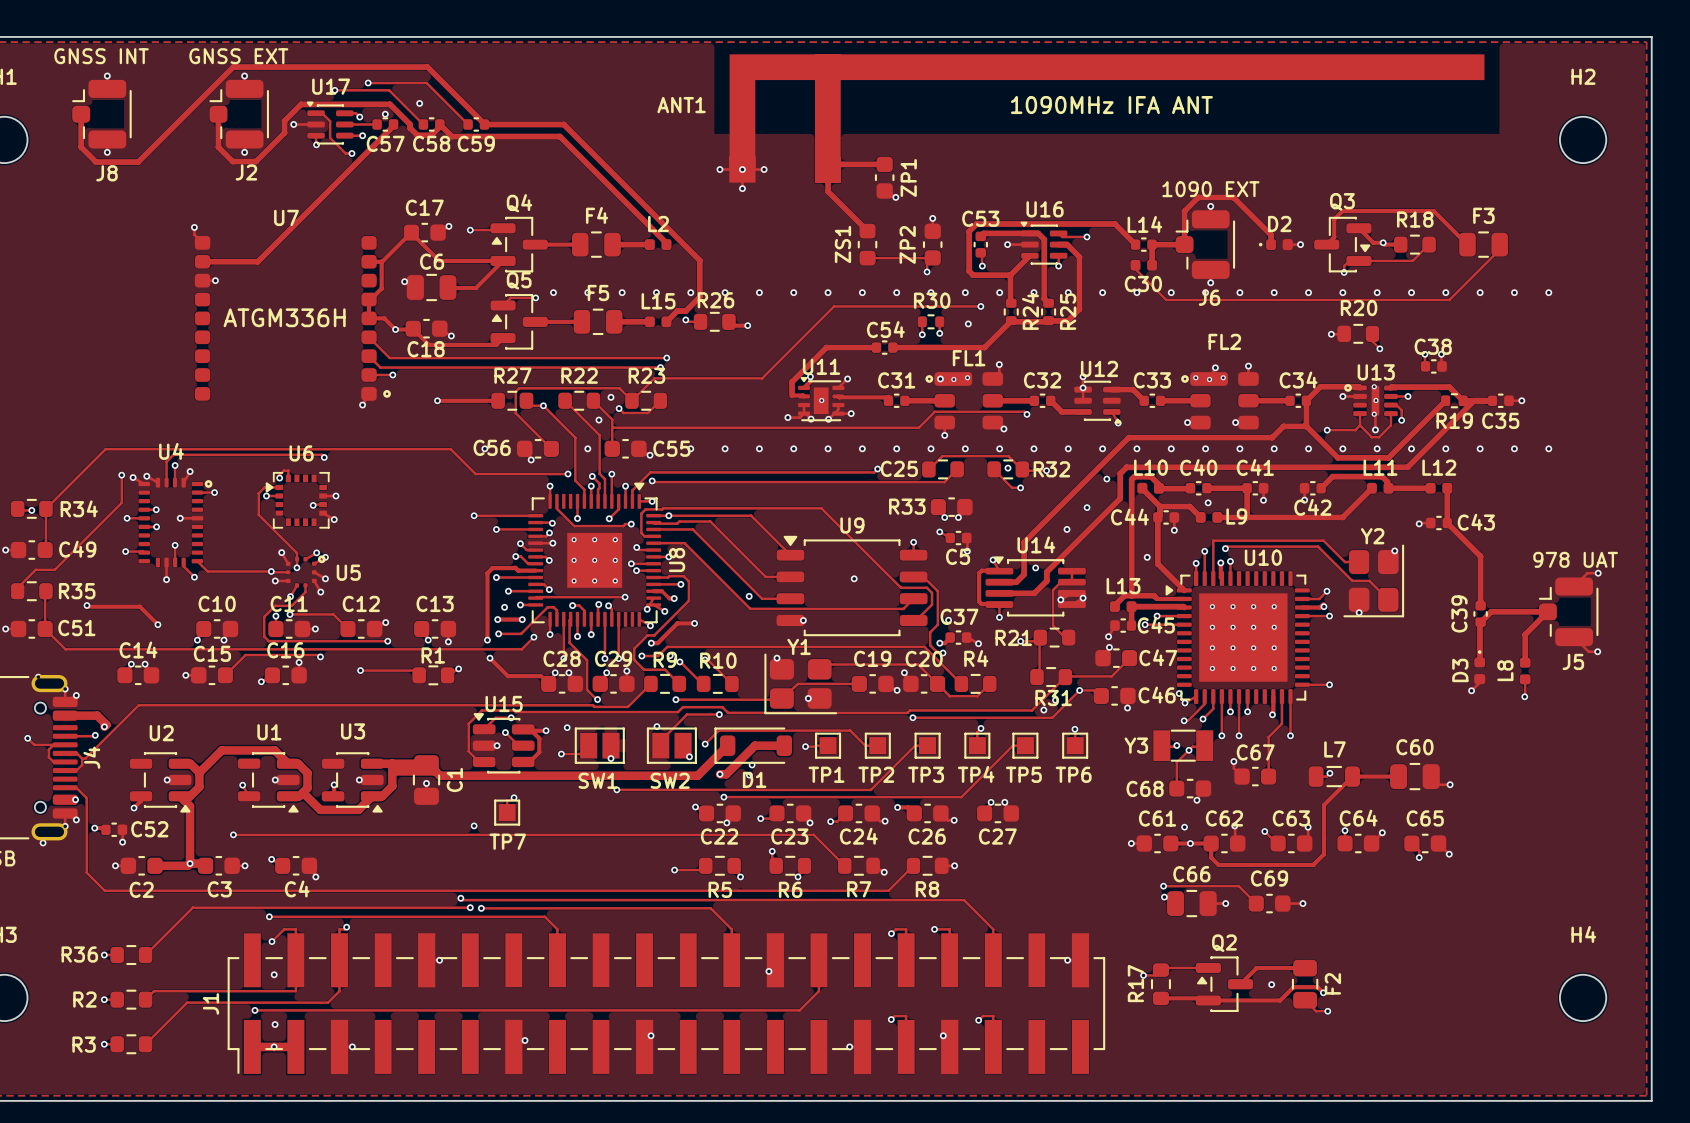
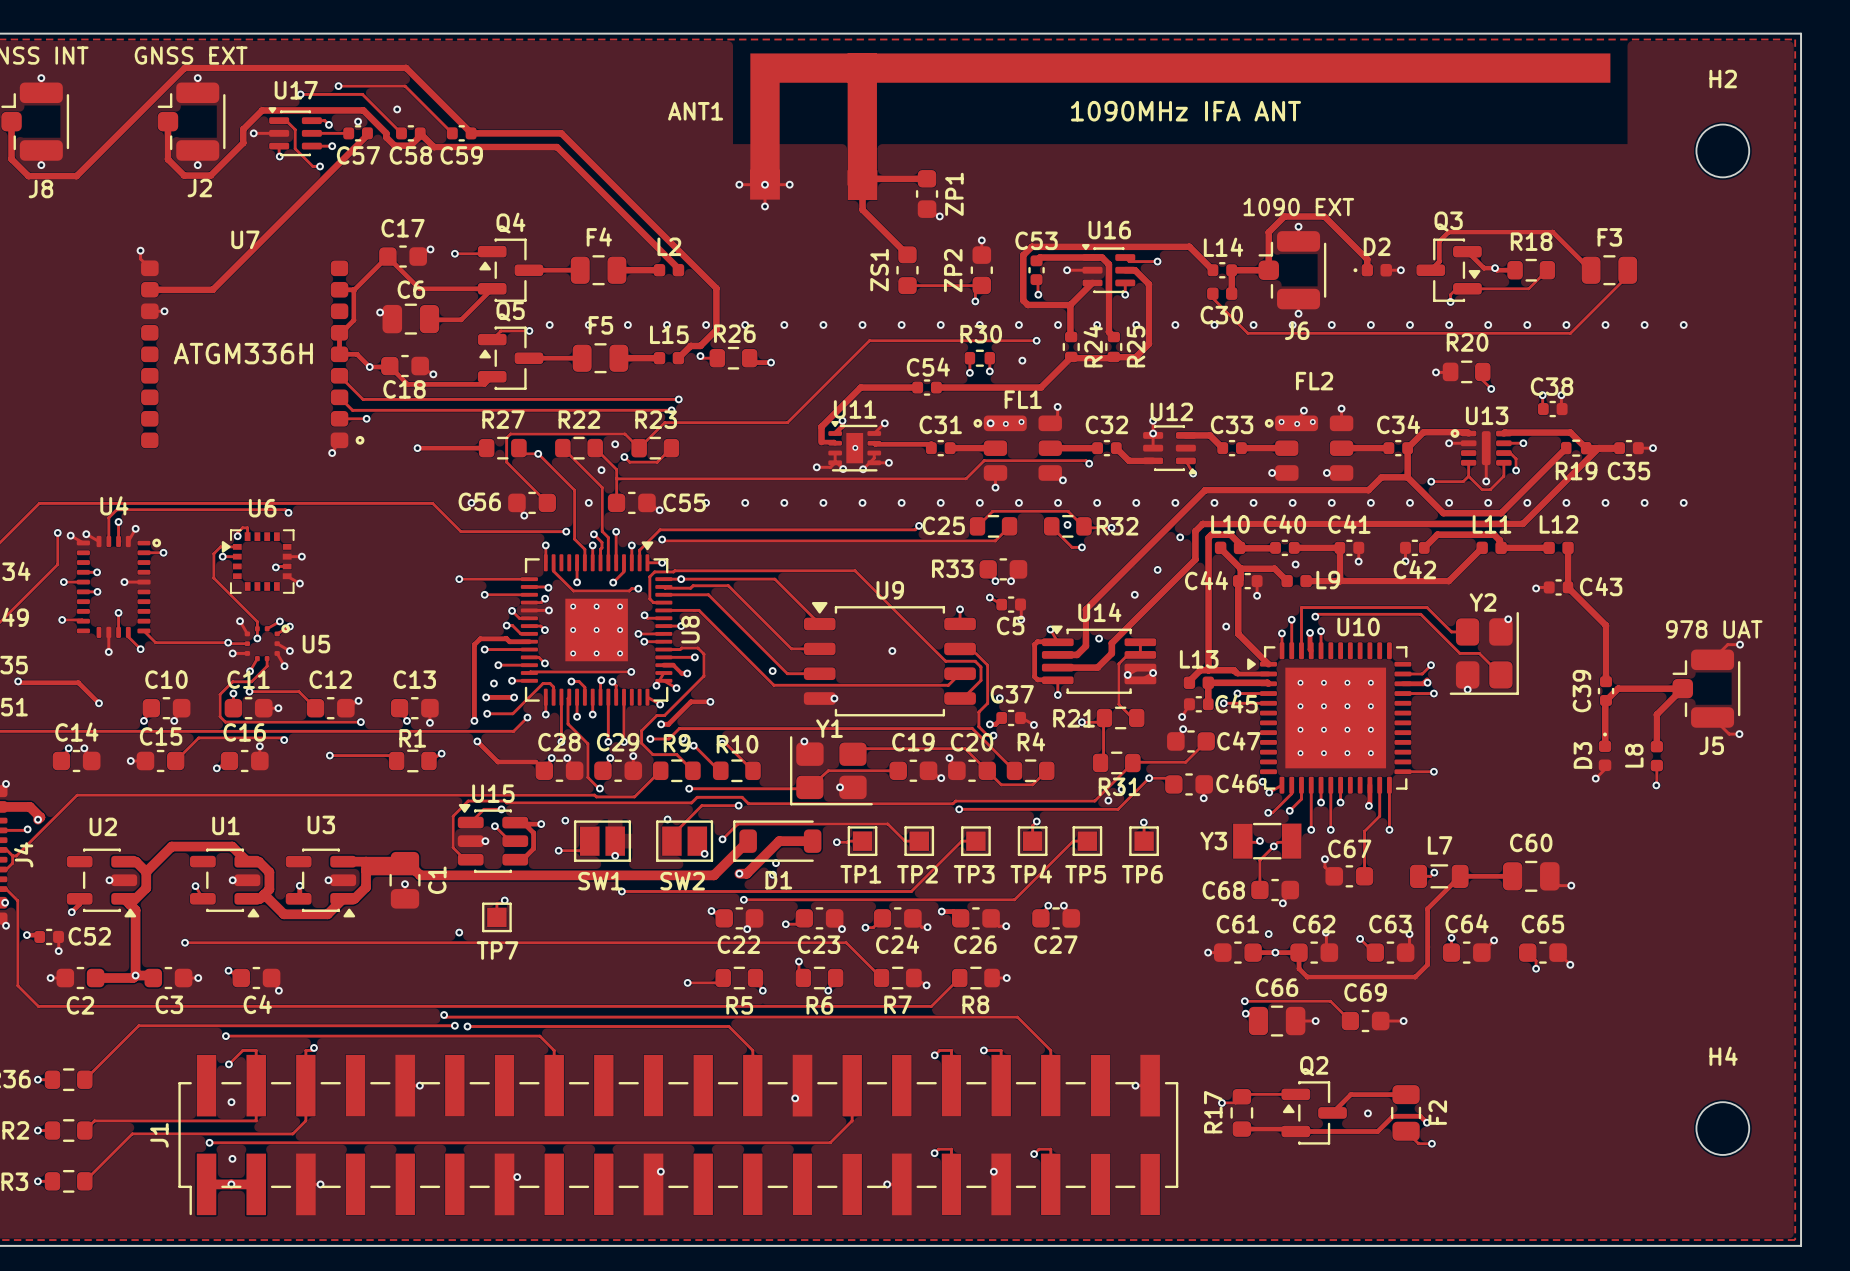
via: (1374, 386) -> none
via: (1375, 400) -> none
via: (1374, 414) -> none

